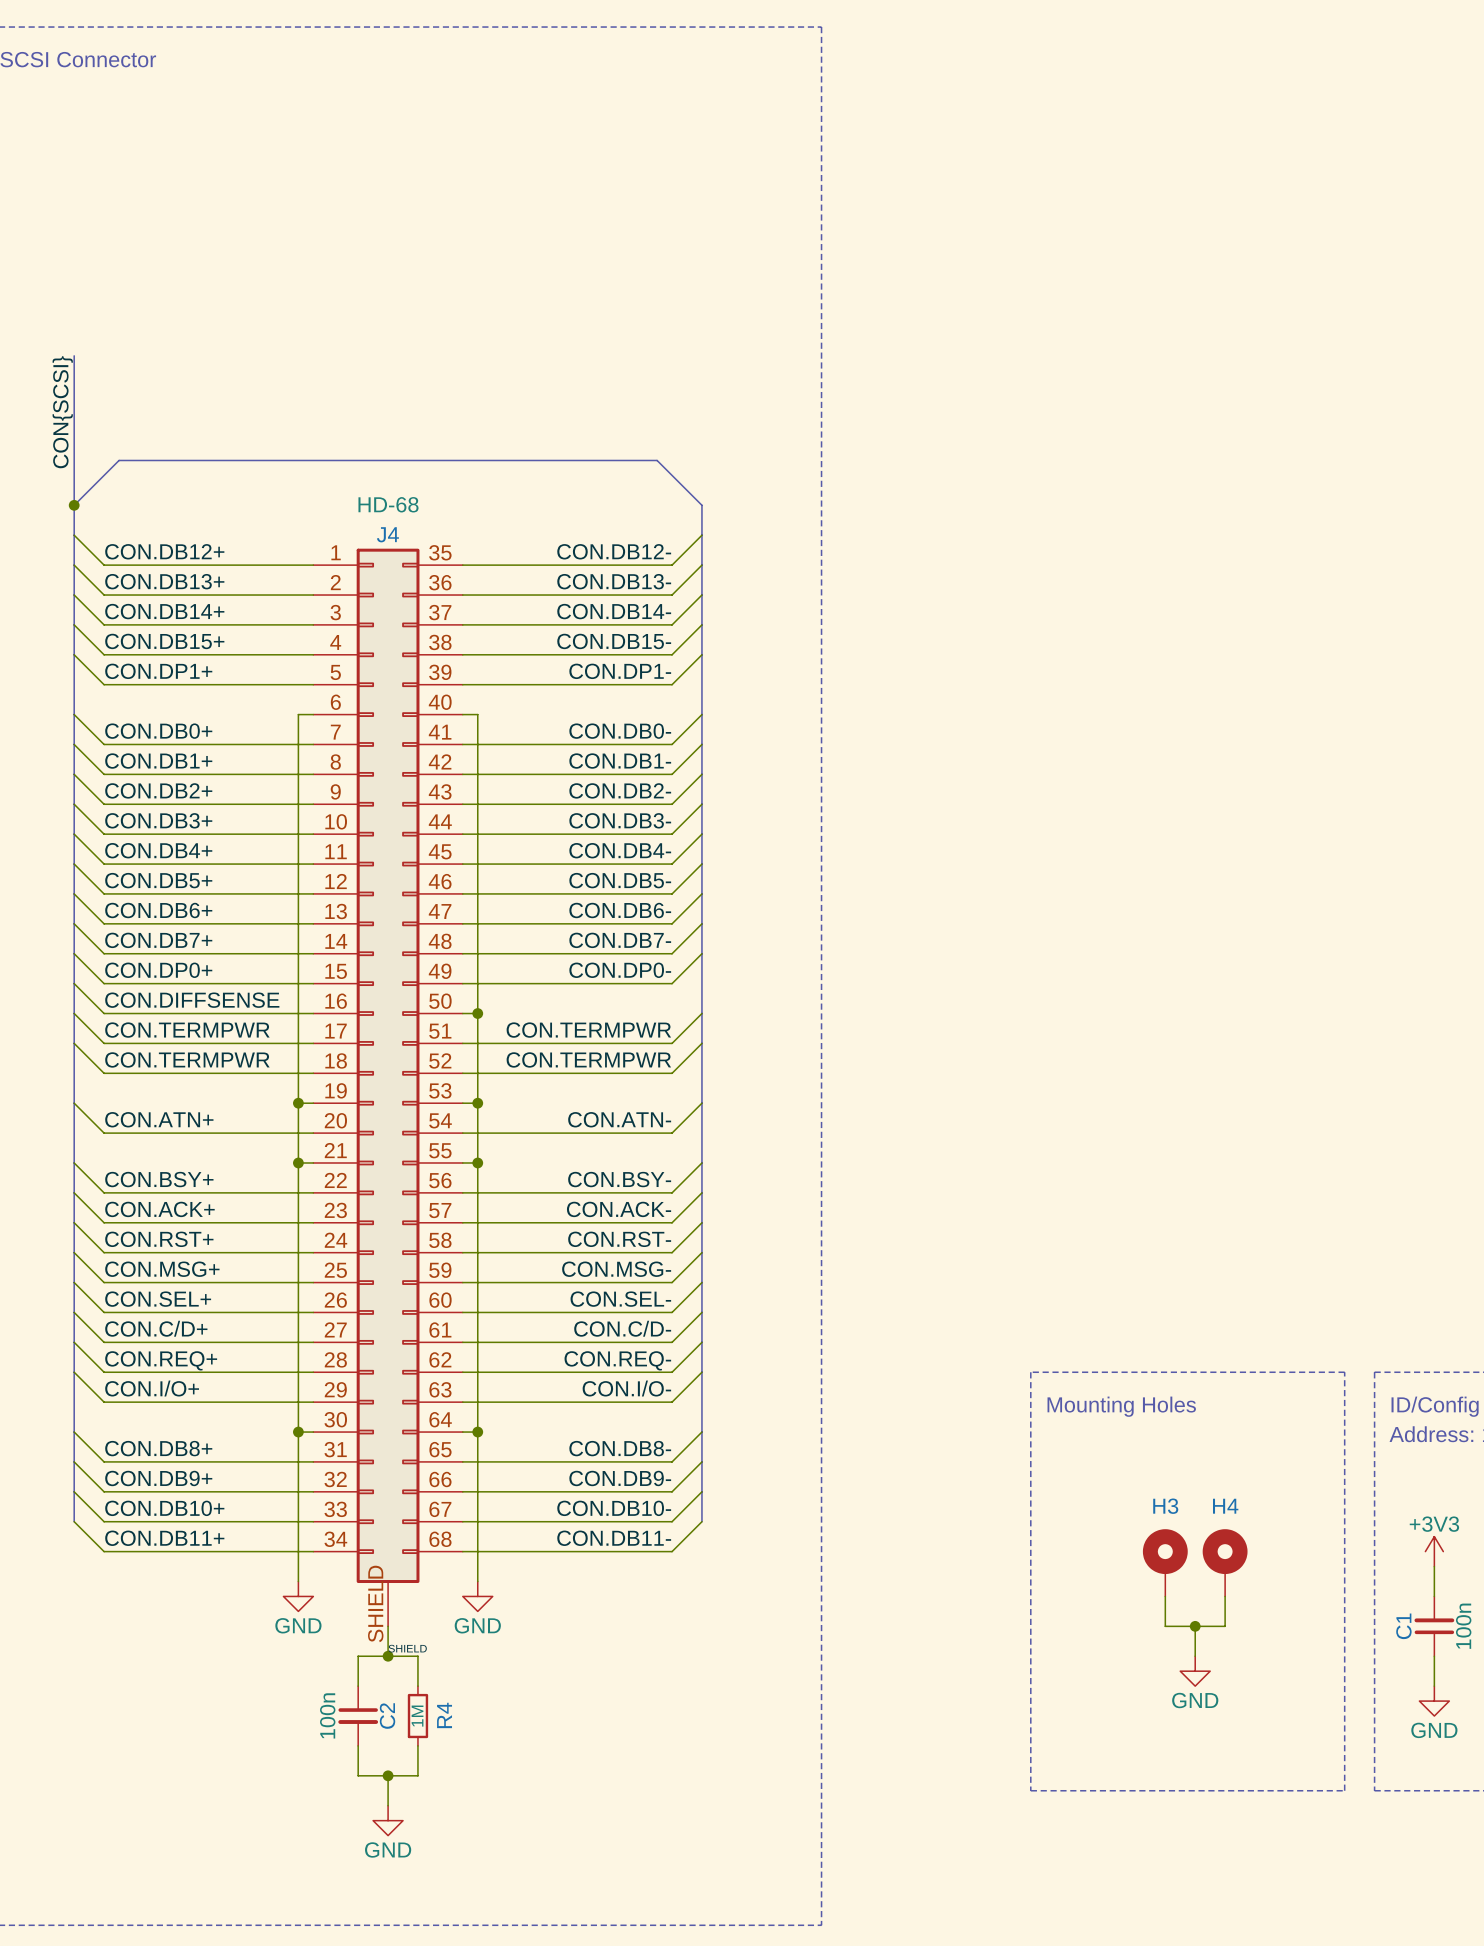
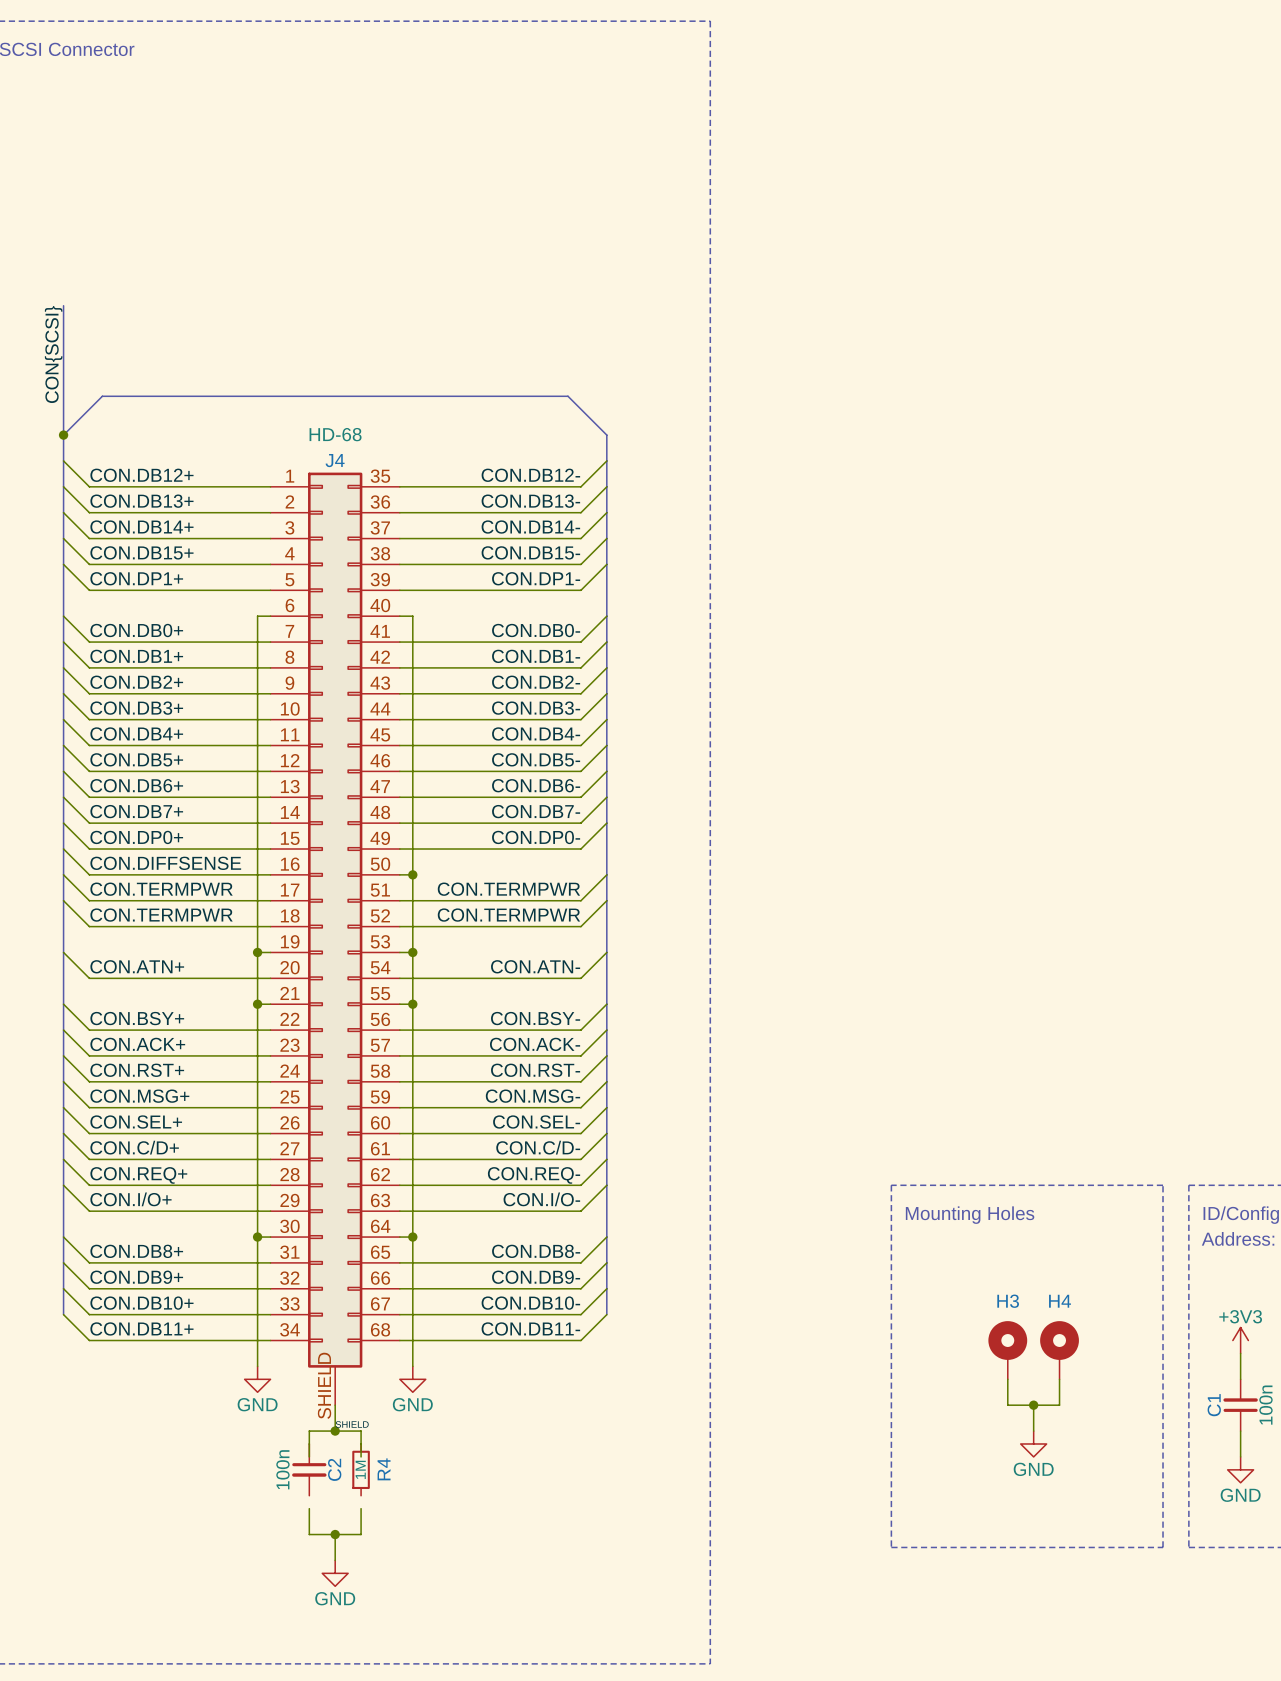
C2 position: (358, 1716) -> (309, 1469)
R4 position: (417, 1716) -> (361, 1469)

